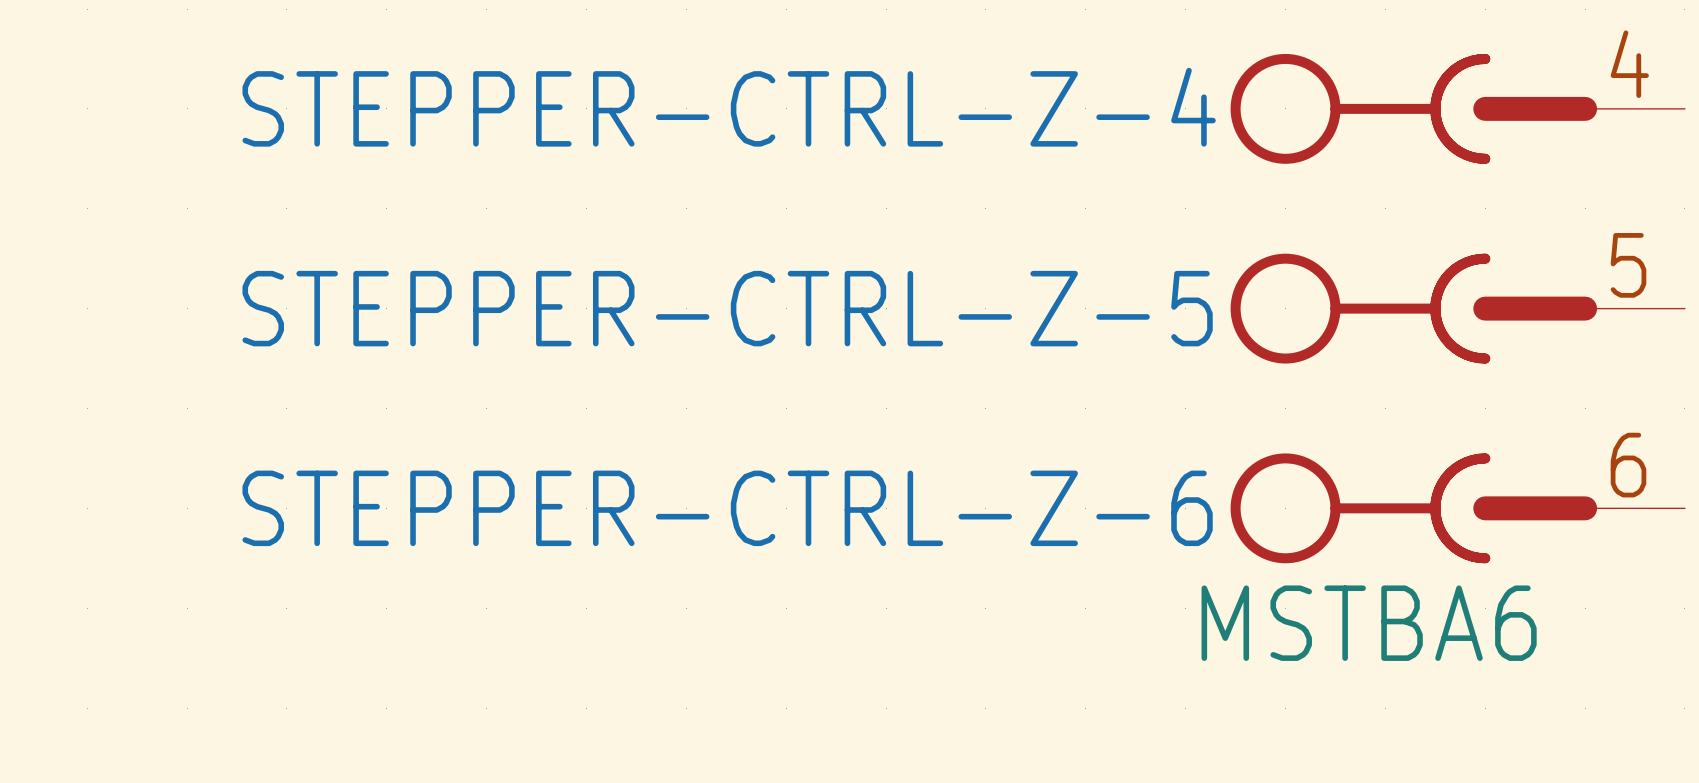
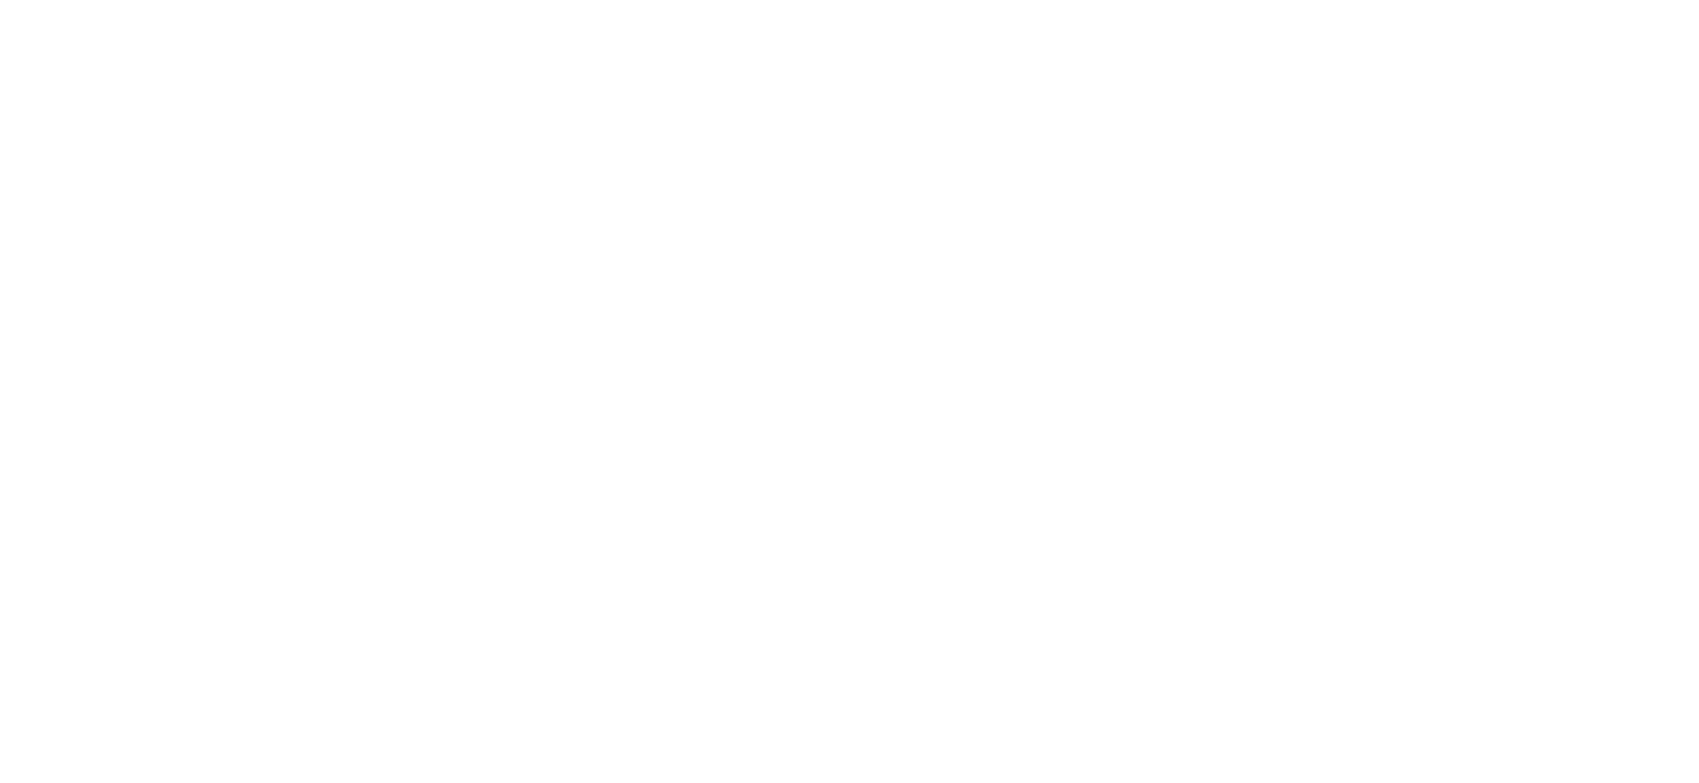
STEPPER-CTRL-Z-4: (1457, 108) -> none
STEPPER-CTRL-Z-5: (1457, 308) -> none
STEPPER-CTRL-Z-6: MSTBA6 (1457, 508) -> none

